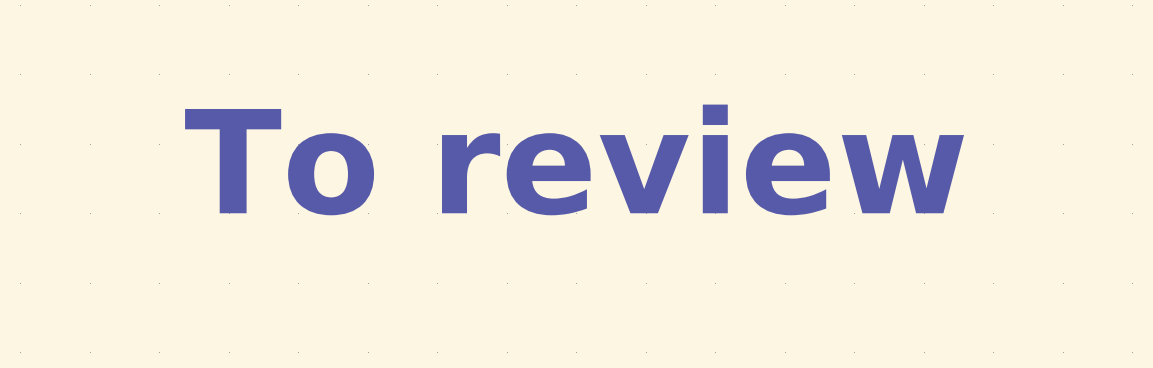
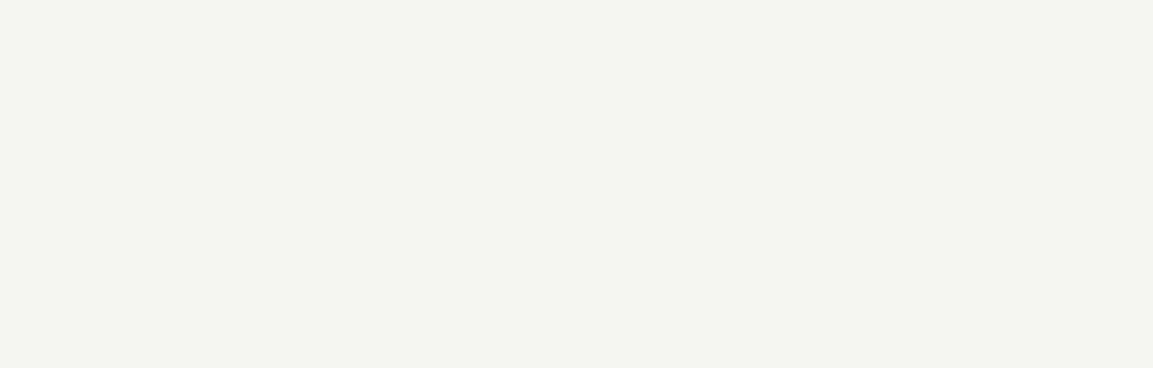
text: To review (574, 159) -> none

